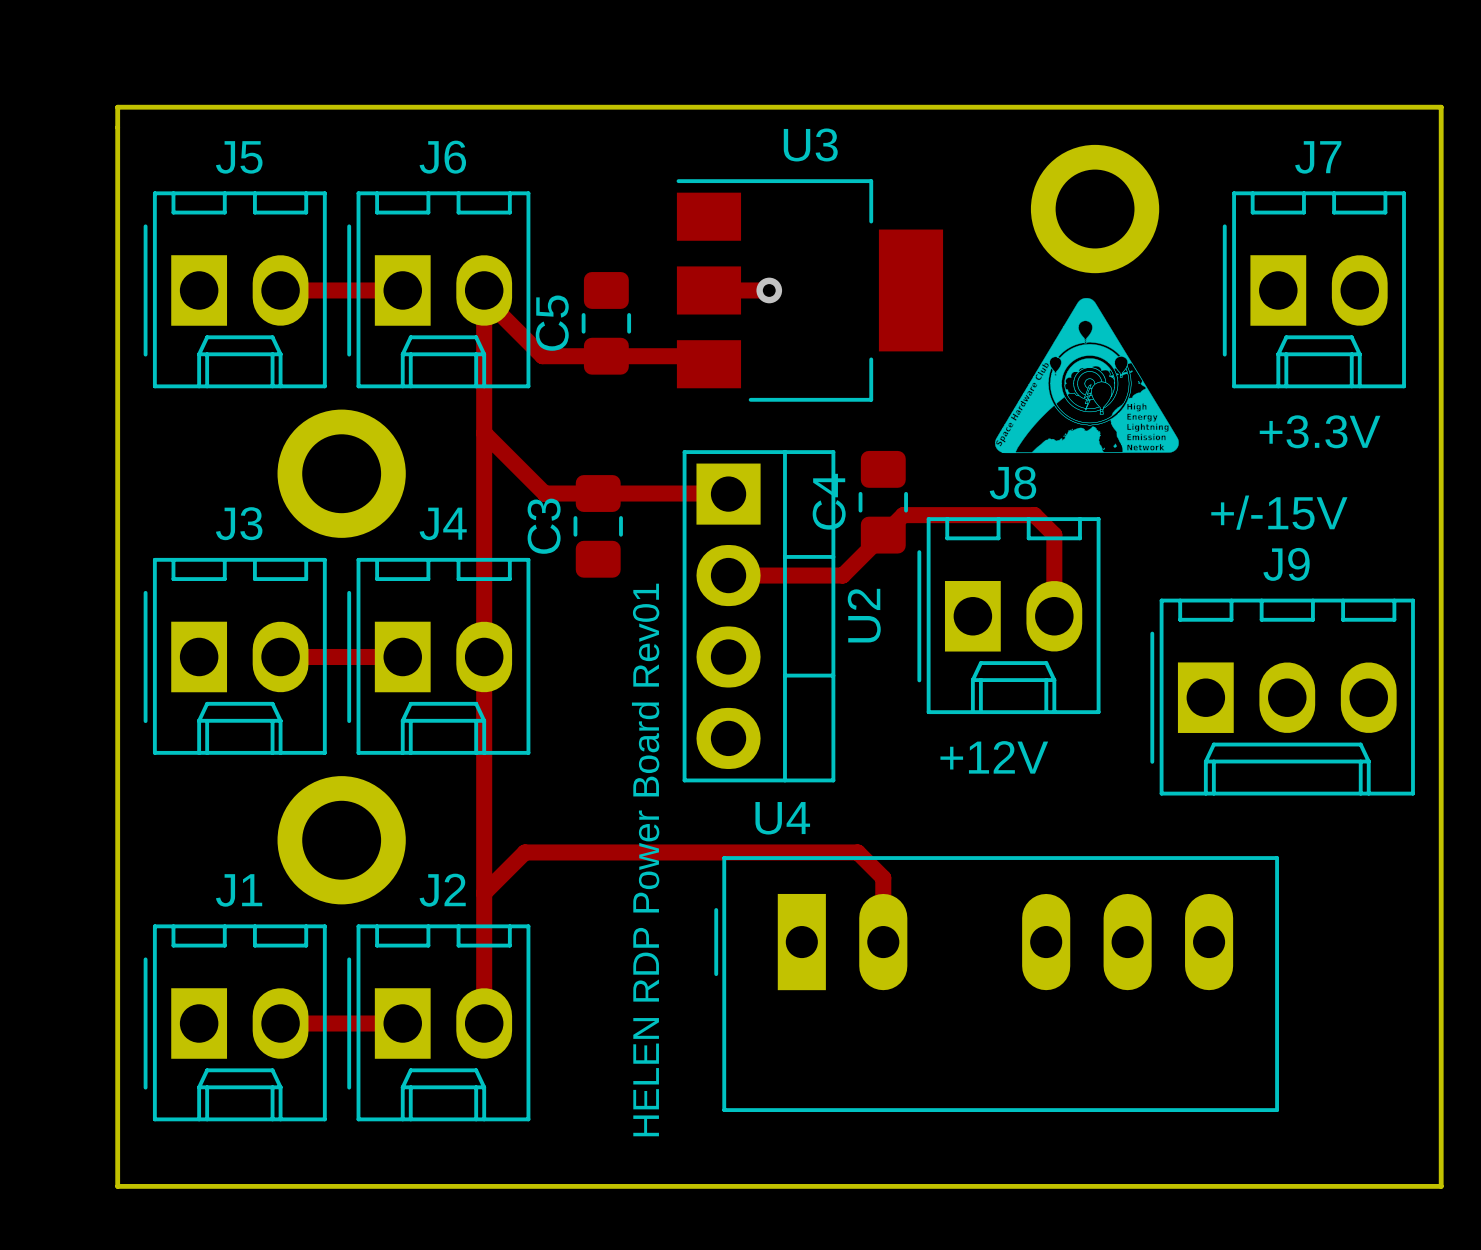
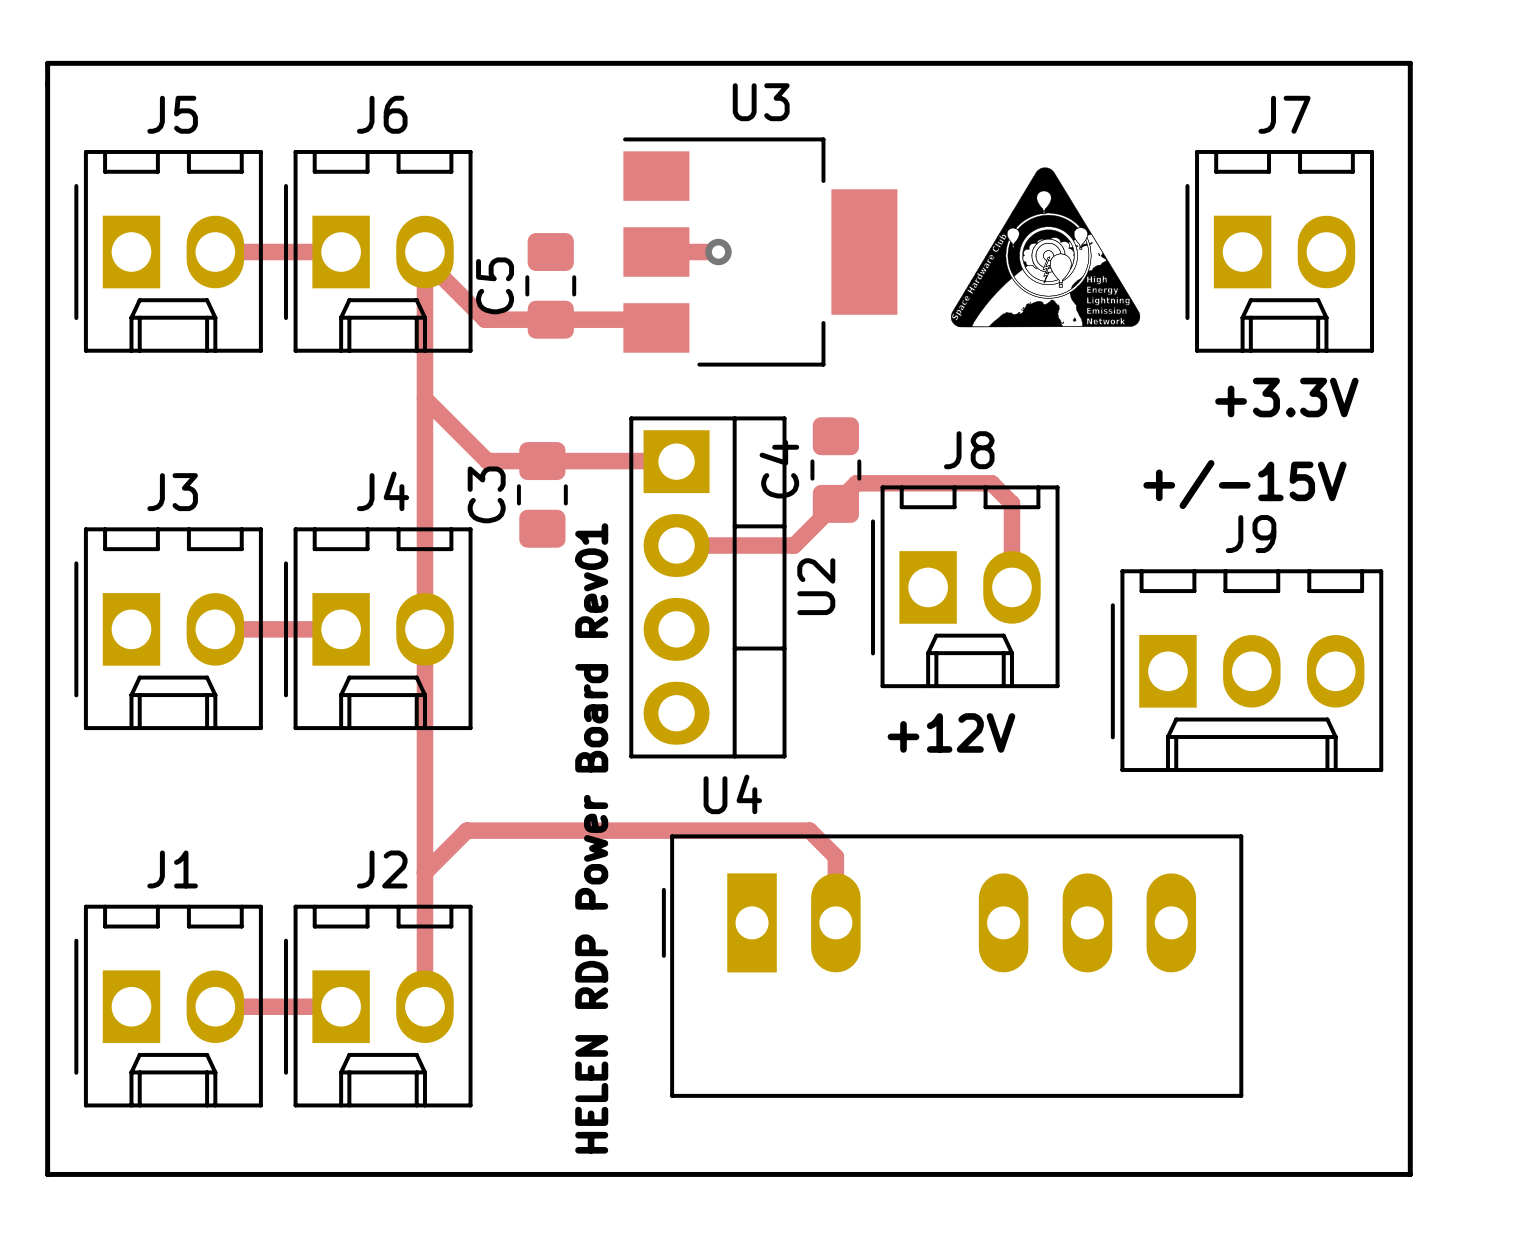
part: (1095, 209) -> none
drawing position: (1086, 375) -> (1045, 247)
part: (341, 473) -> none
part: (341, 840) -> none

